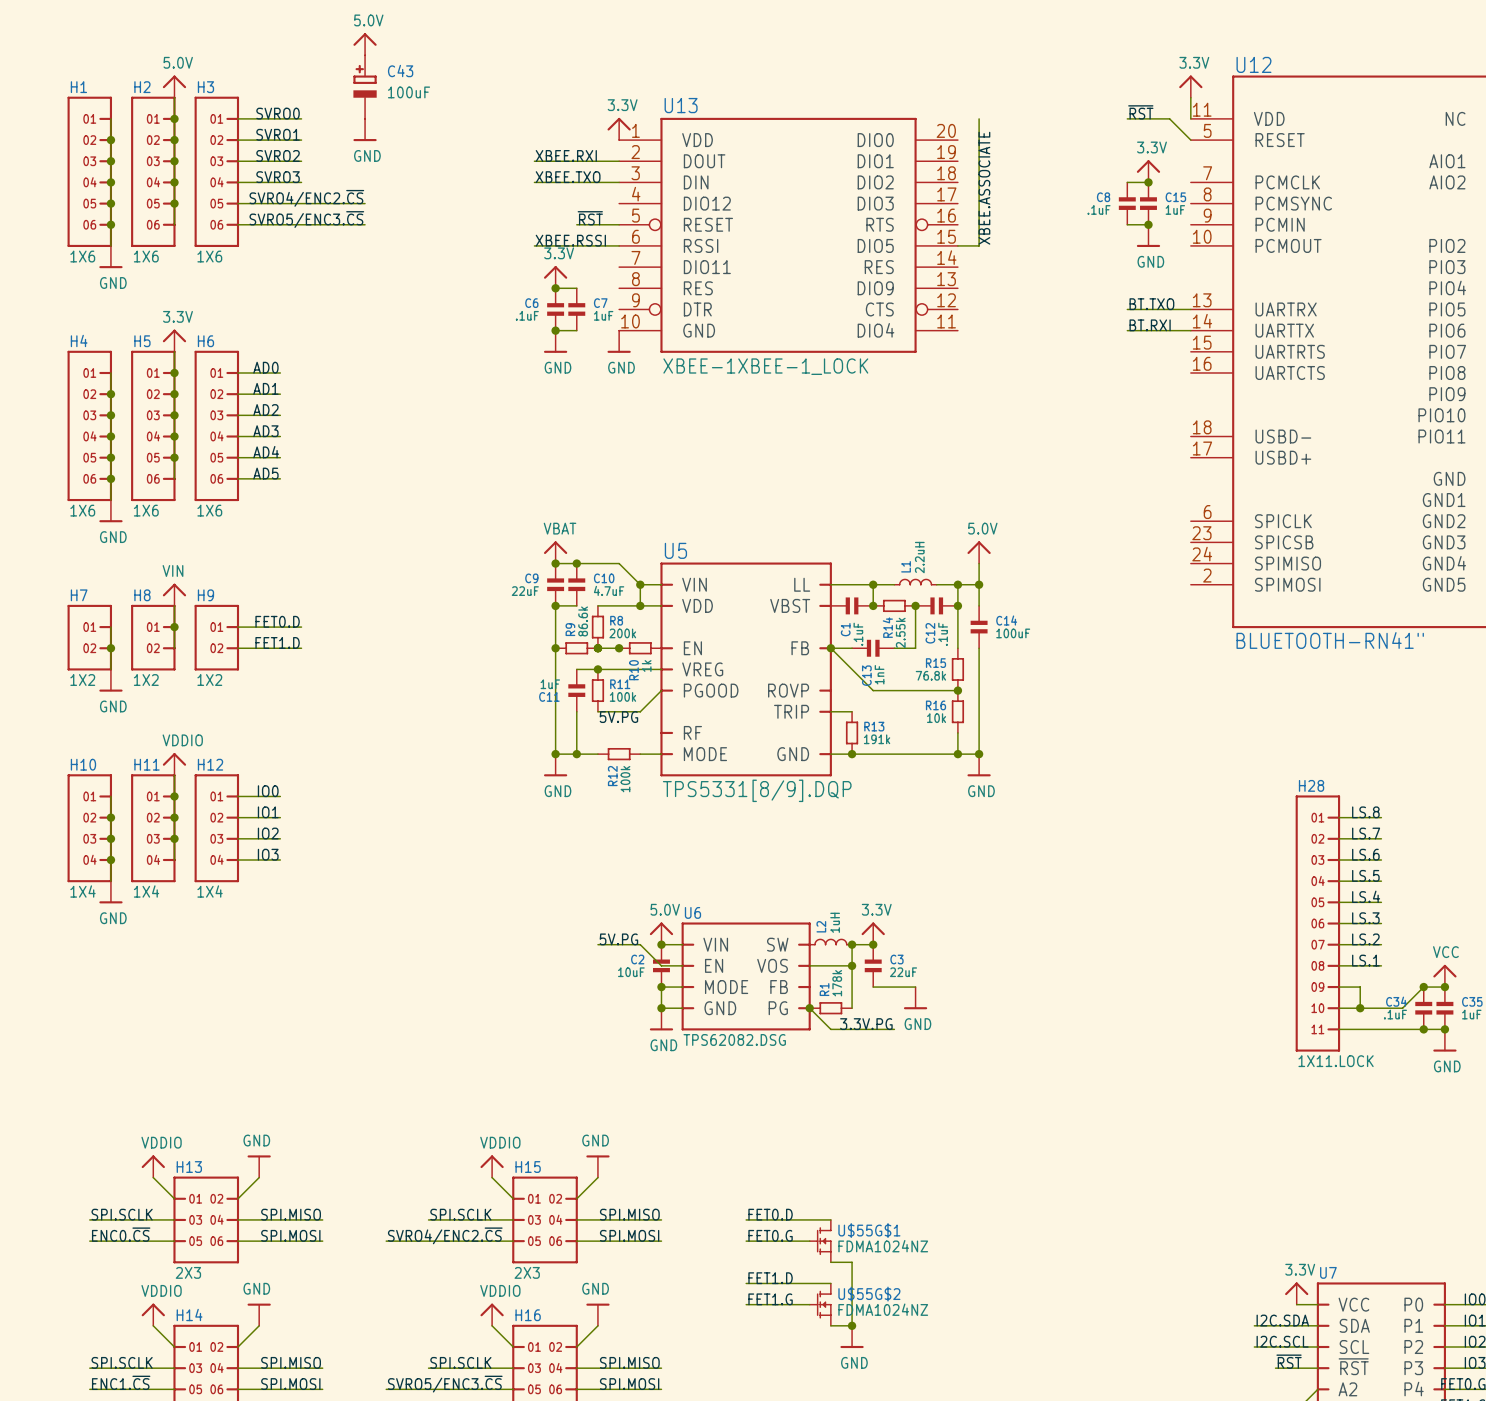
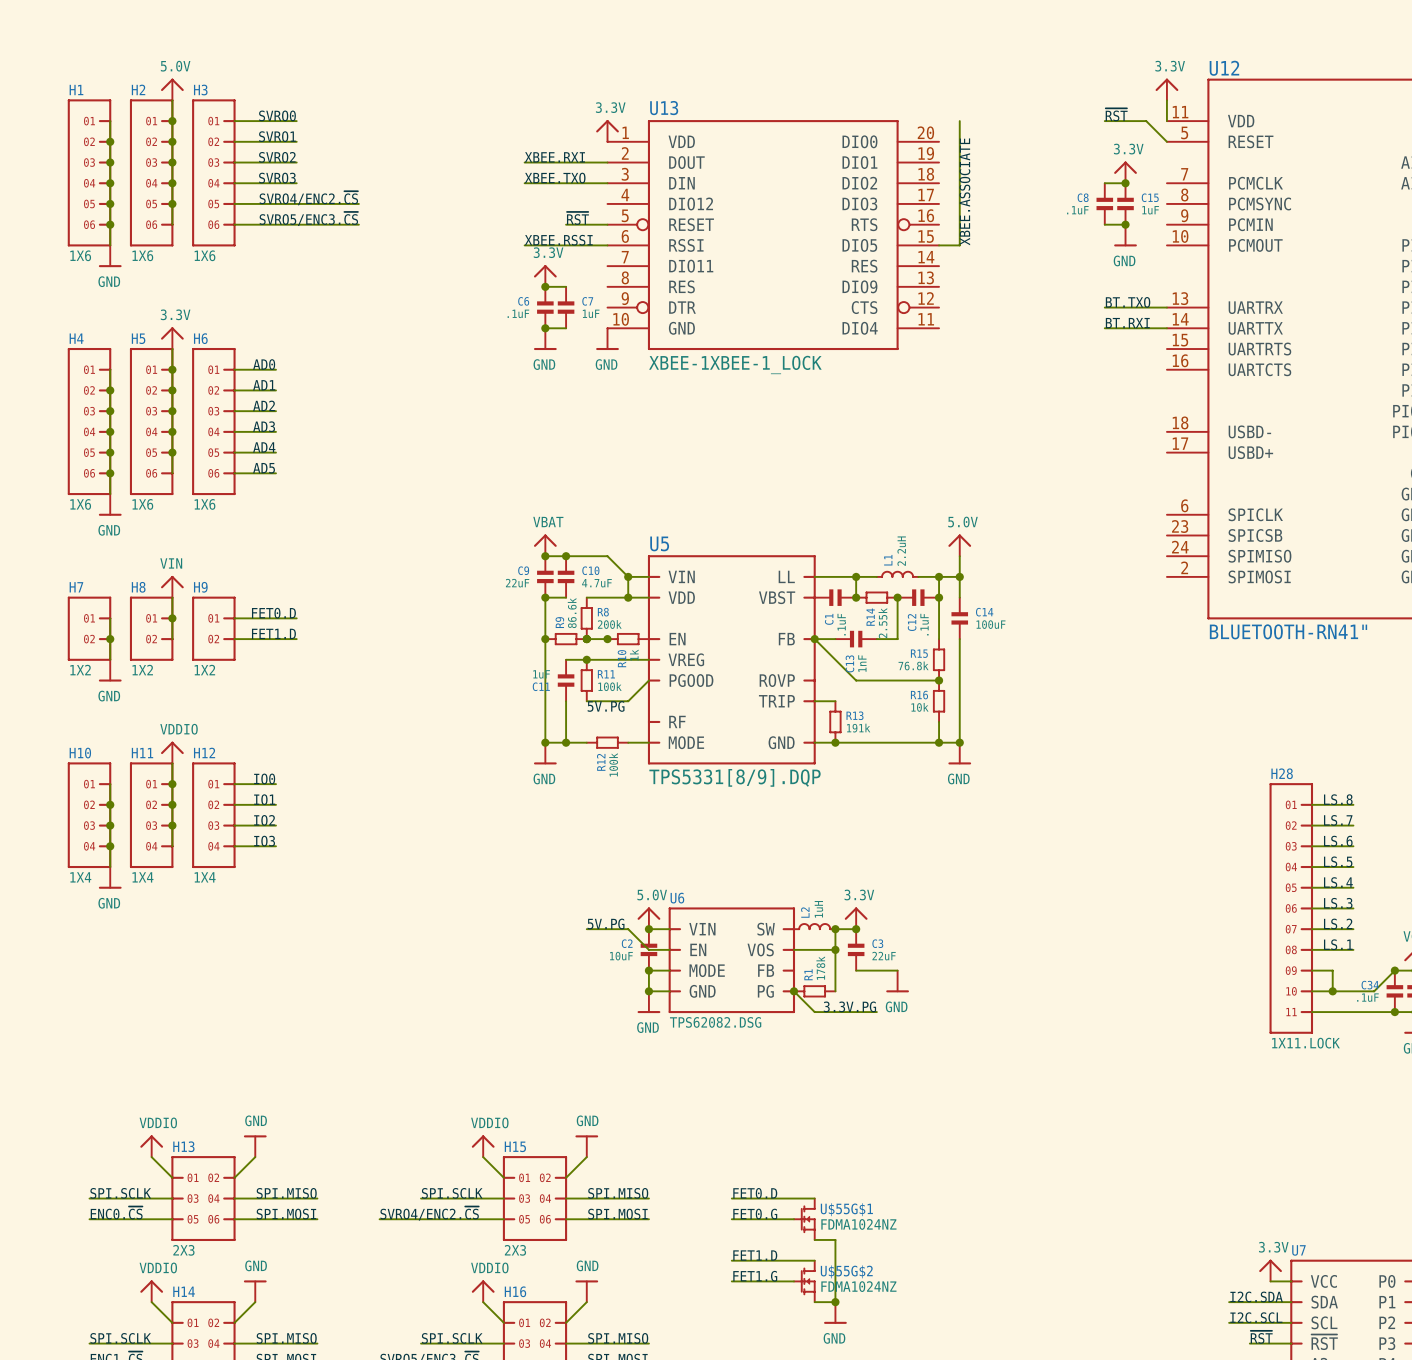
power symbol: 5.0V (365, 44) -> none
C43: 100uF (365, 87) -> none
power symbol: GND (365, 130) -> none

